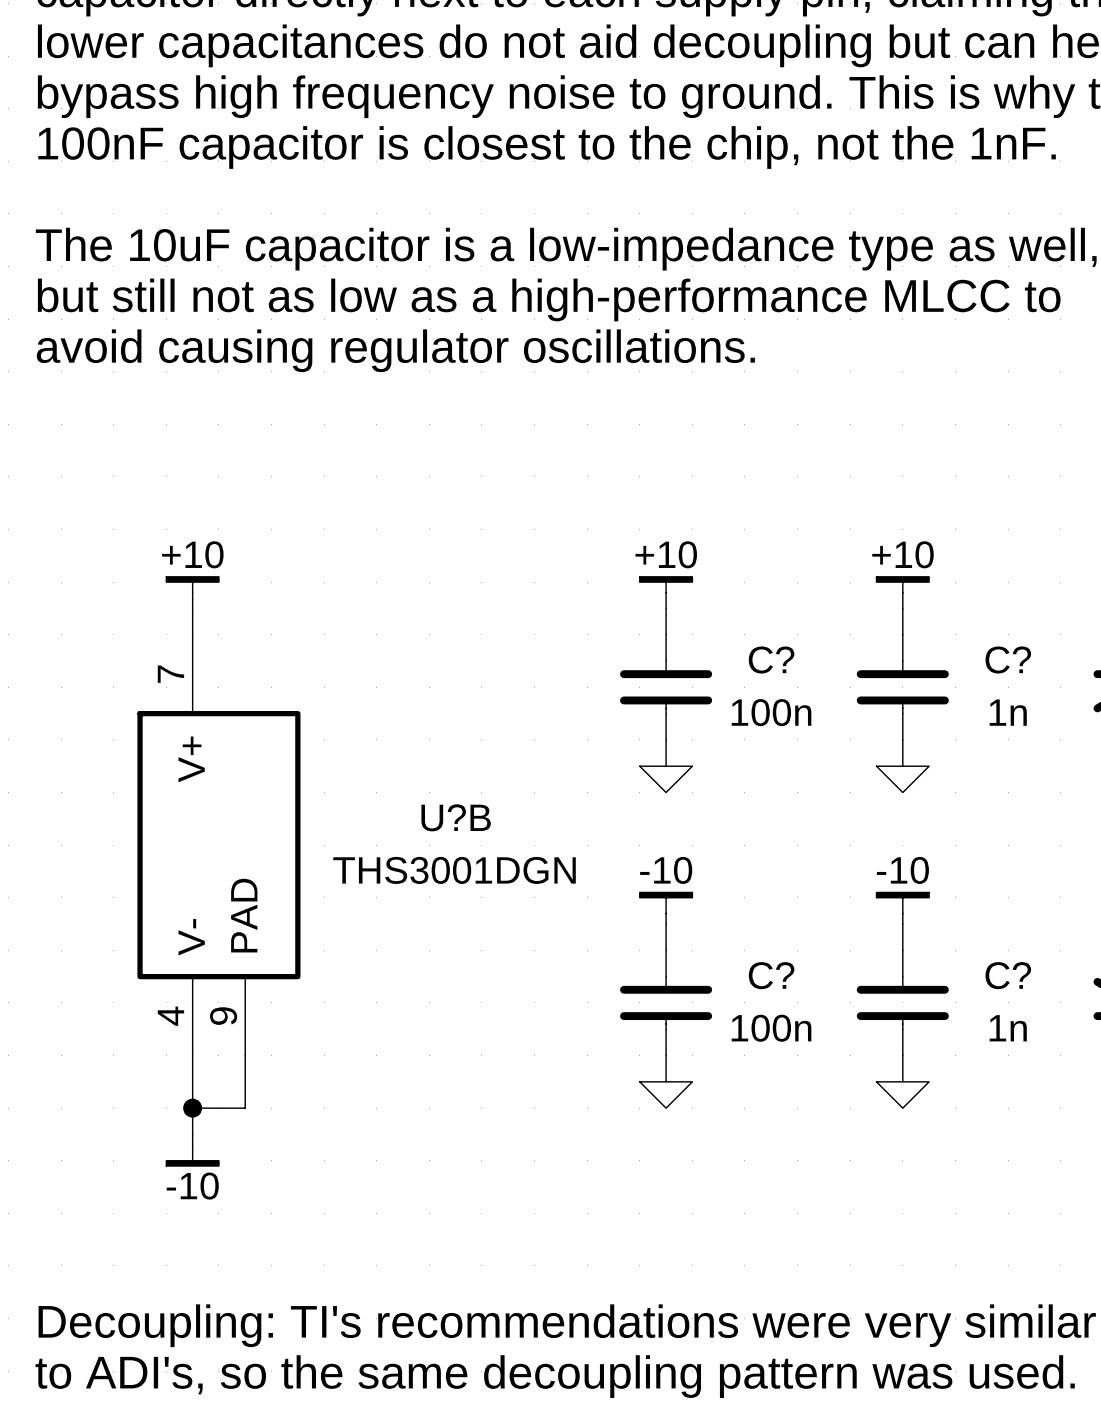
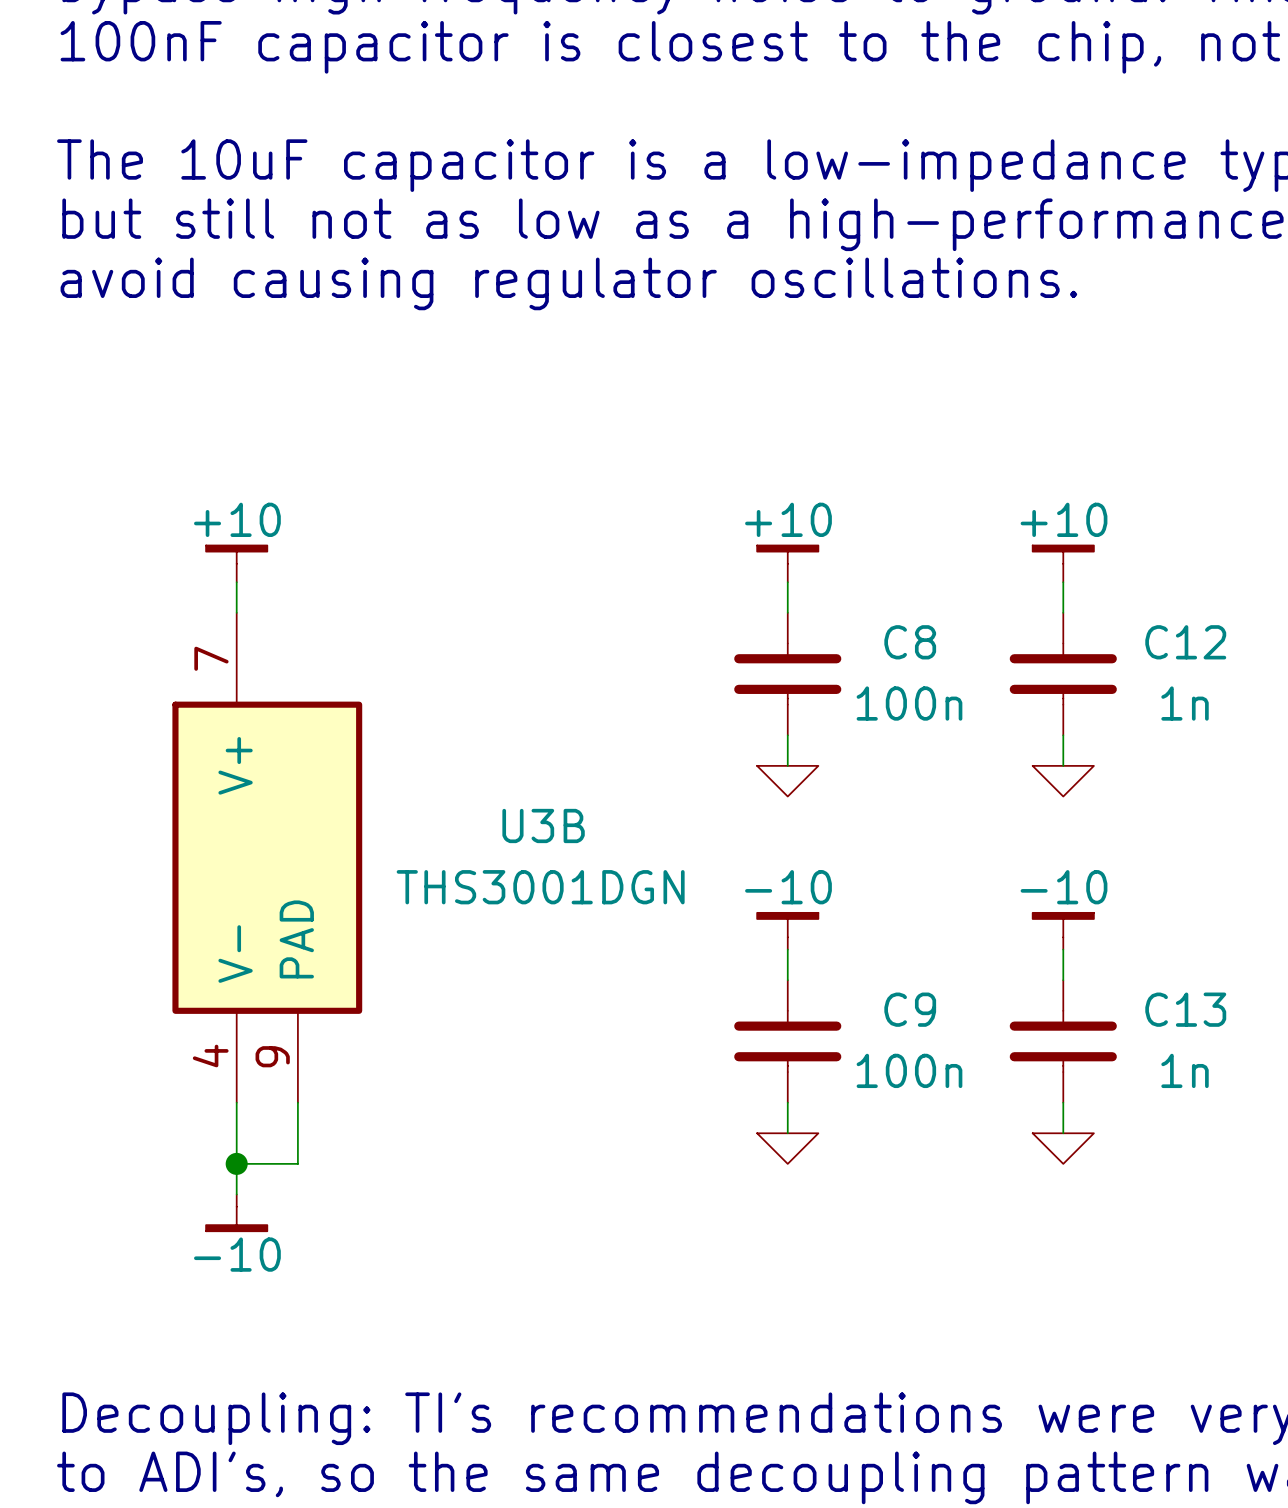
C? name: C? (771, 660) -> C8 (910, 642)
C? name: C? (1008, 660) -> C12 (1185, 642)
U?B name: U?B (456, 817) -> U3B (543, 825)
C? name: C? (771, 975) -> C9 (910, 1009)
C? name: C? (1008, 975) -> C13 (1185, 1009)

